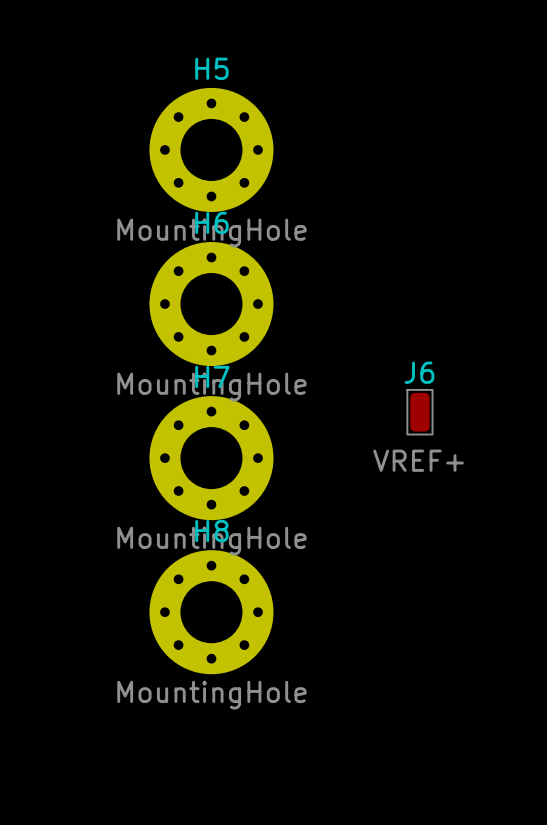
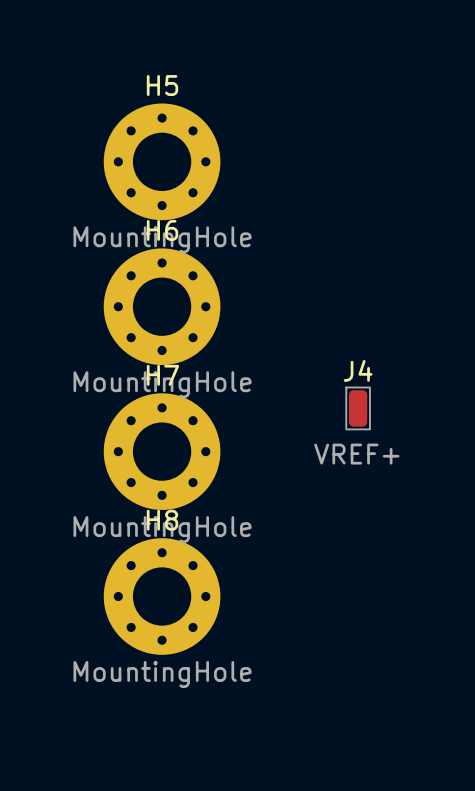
J6 name: J6 (419, 372) -> J4 (358, 370)

